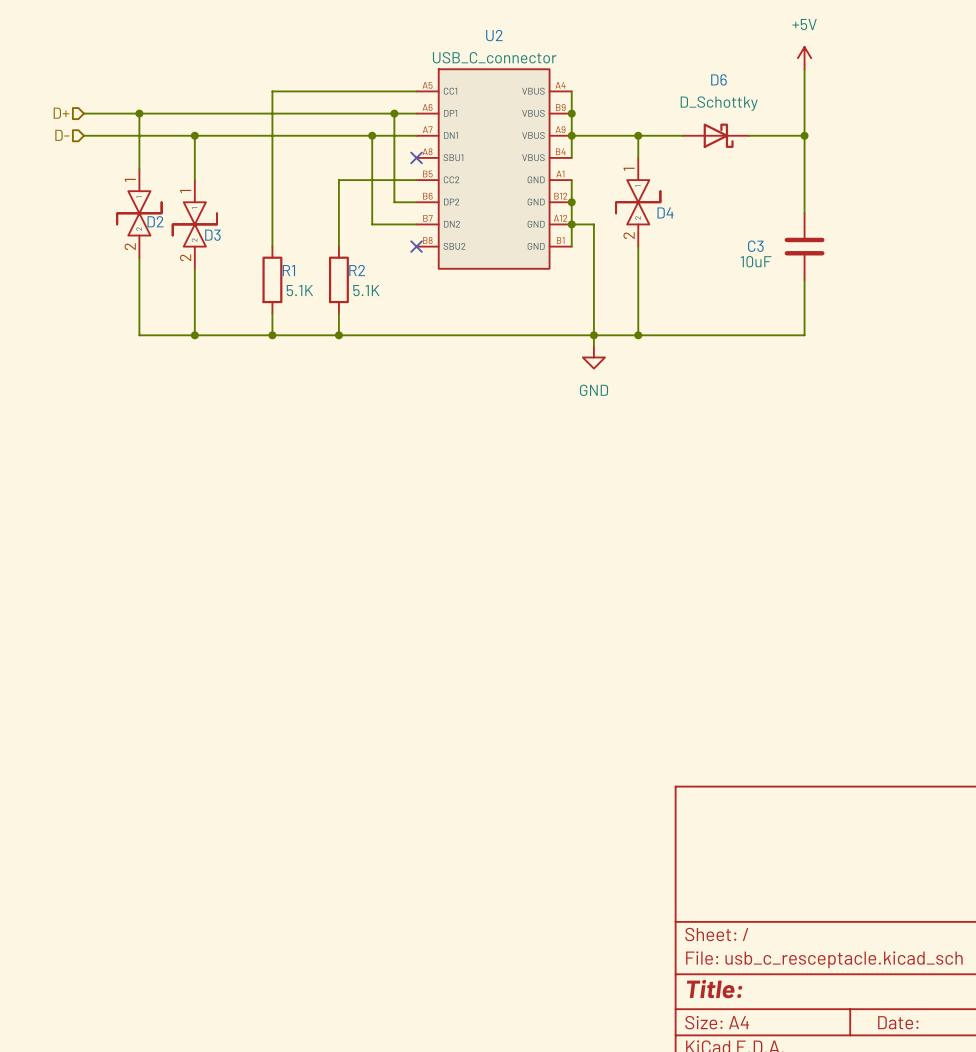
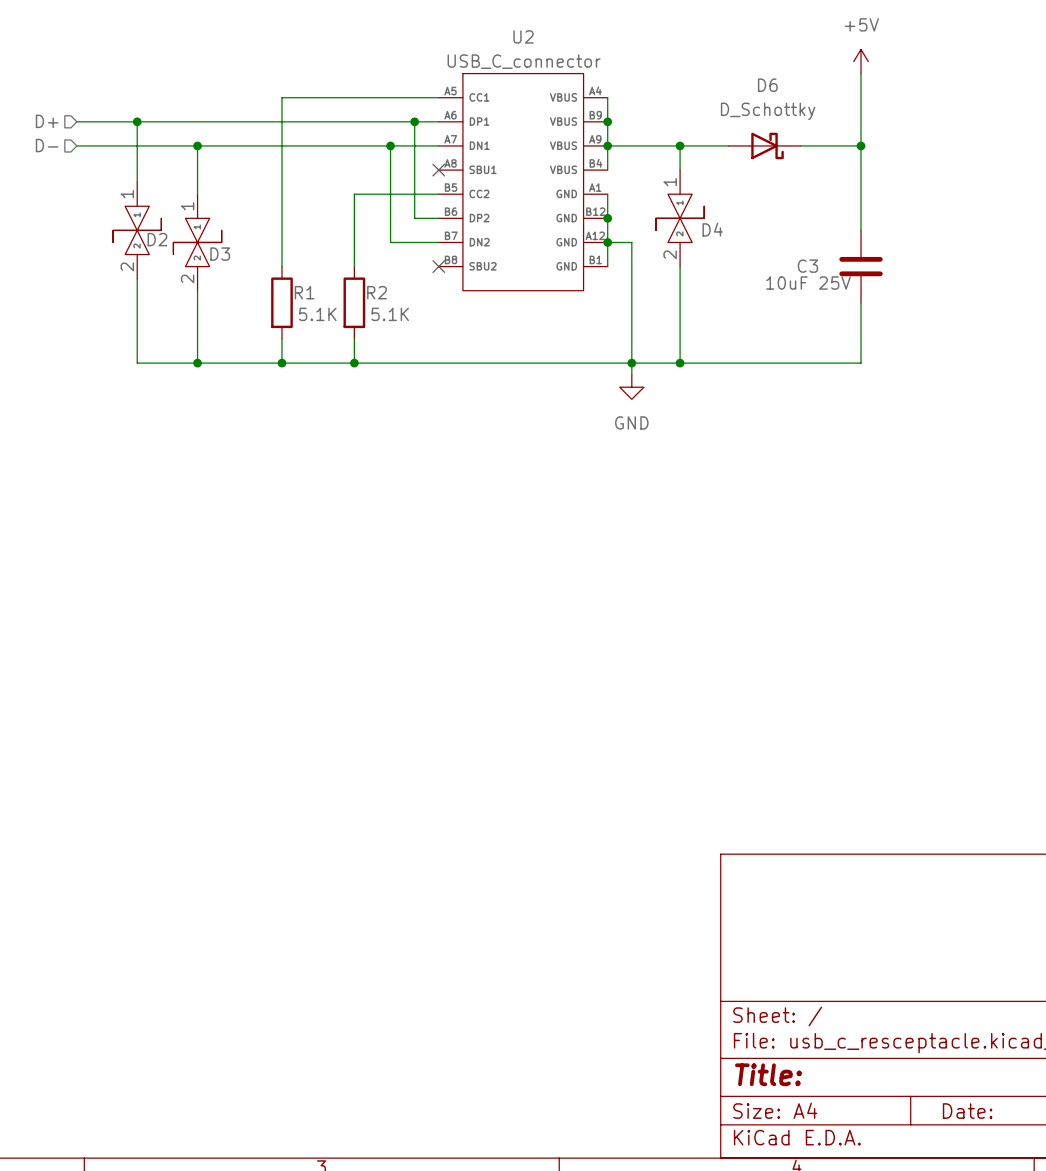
C3 value: 10uF (756, 261) -> 10uF 25V (808, 283)

